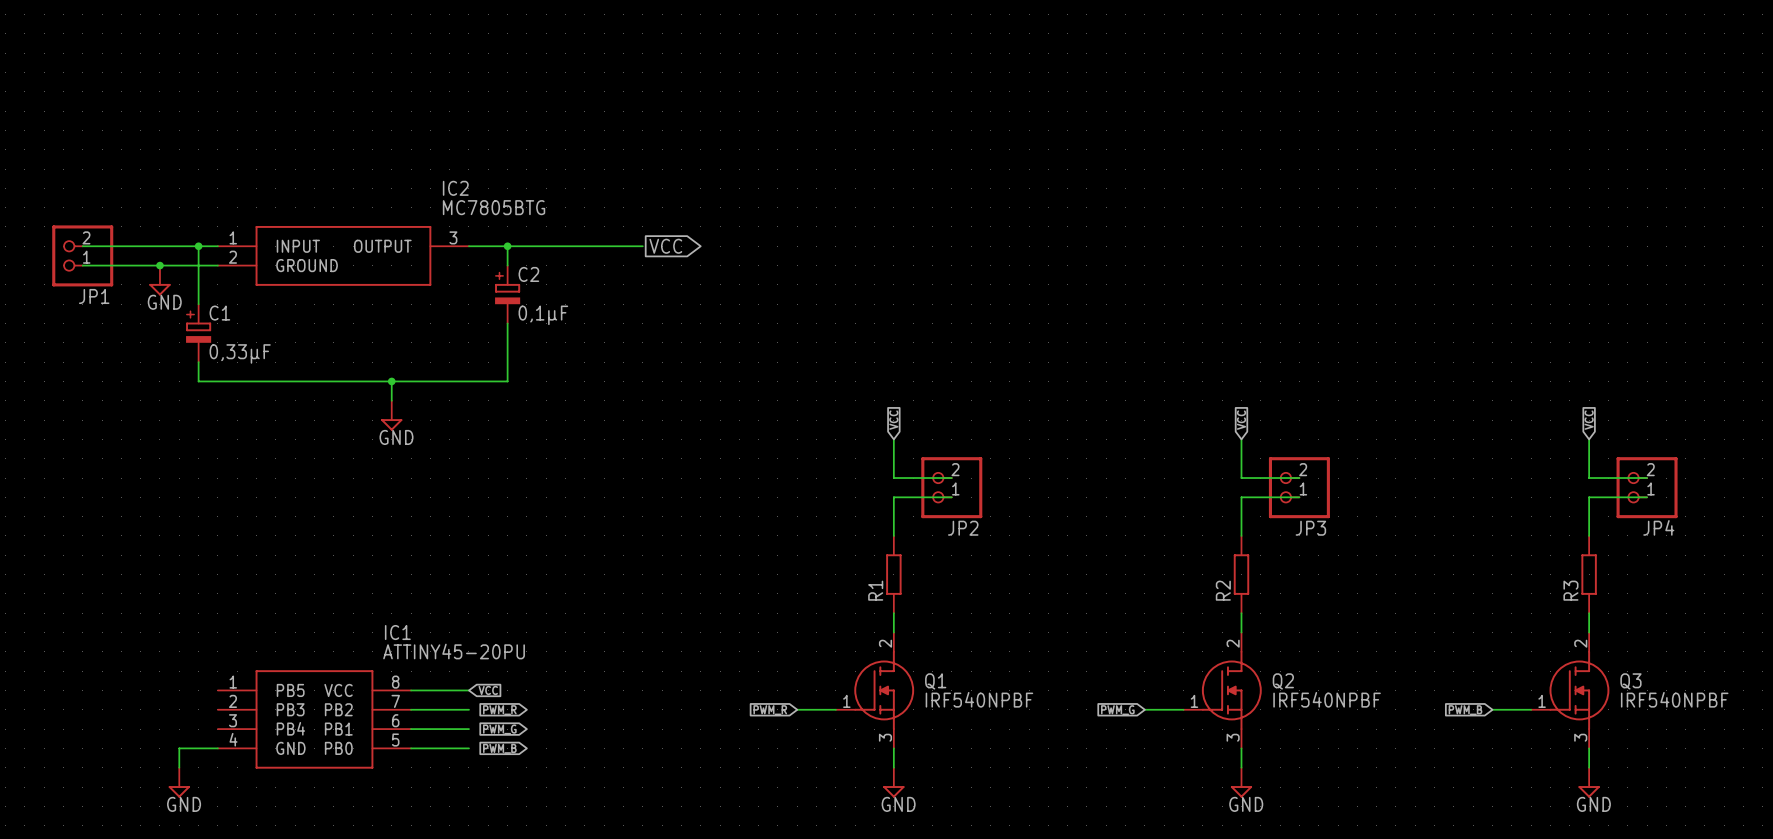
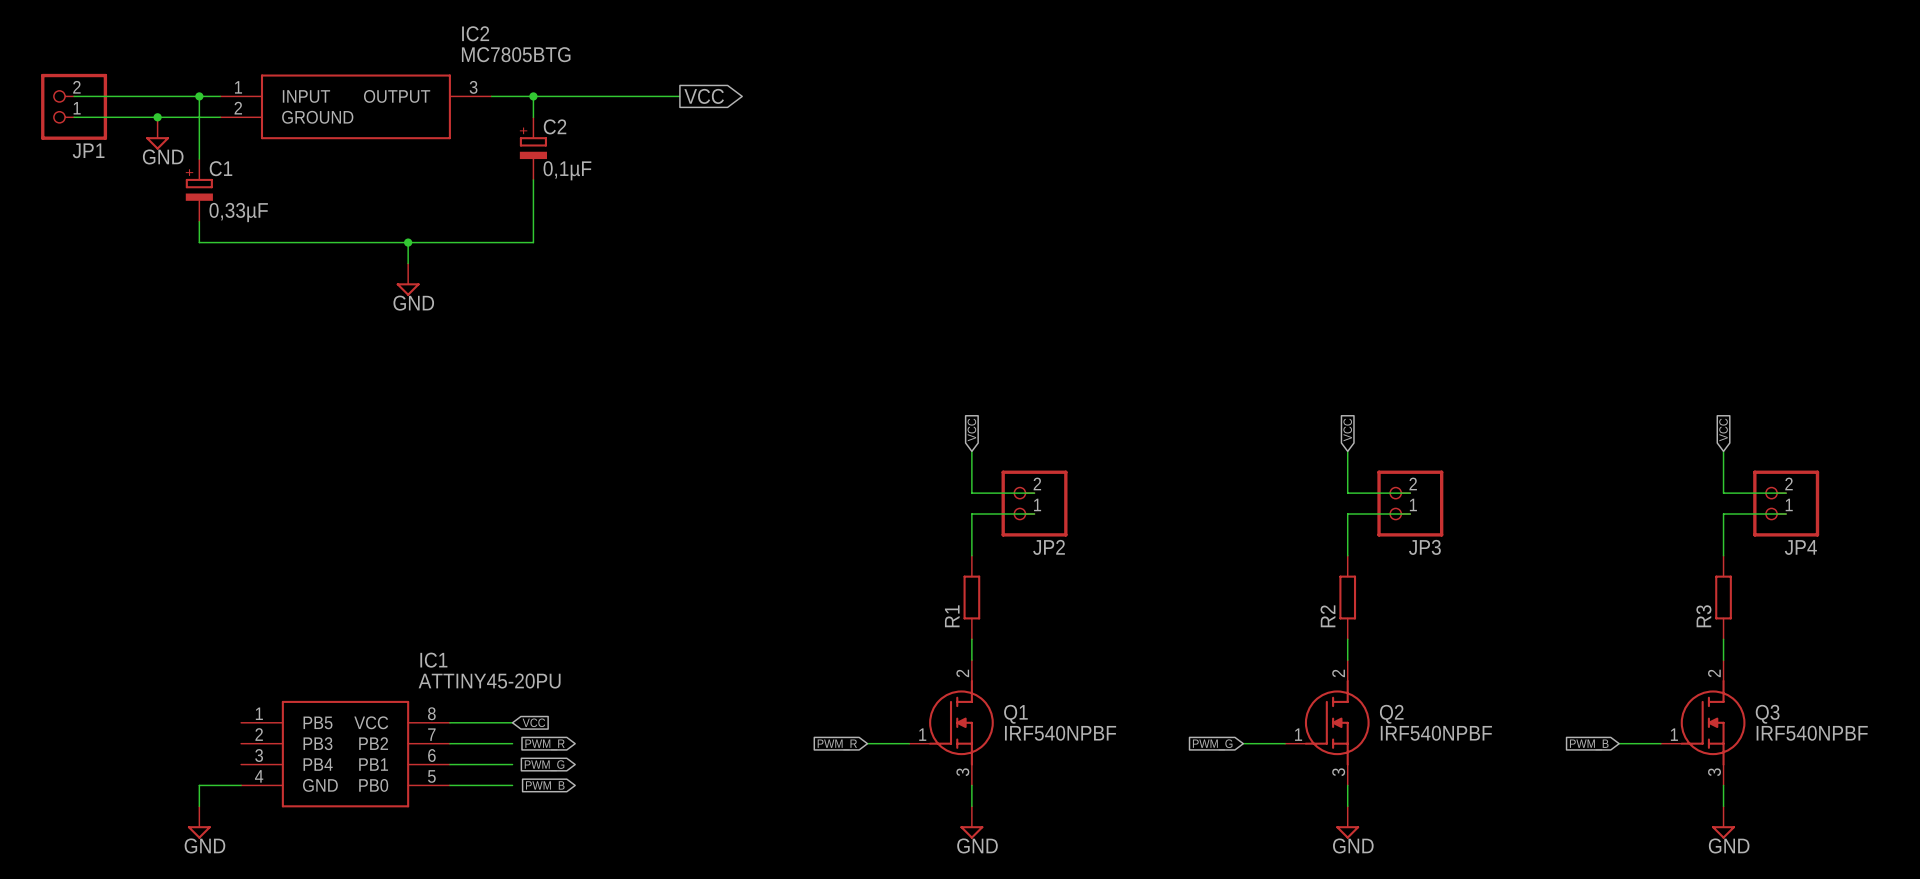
wire: none -> (74, 96) (220, 96)
junction: none -> (199, 96)
wire: none -> (491, 96) (679, 96)
junction: none -> (533, 96)
junction: none -> (157, 117)
power symbol: none -> GND (157, 133)
wire: (82, 246) (179, 246) -> (199, 221) (199, 242)
wire: (198, 246) (198, 304) -> (199, 96) (199, 159)
junction: (198, 246) -> none
wire: none -> (241, 242) (512, 242)
junction: none -> (408, 242)
wire: (488, 246) (642, 246) -> (533, 242) (533, 179)
wire: (507, 246) (507, 265) -> (533, 96) (533, 117)
junction: (507, 246) -> none
global label position: VCC (665, 246) -> VCC (704, 96)
JP1 position: (82, 255) -> (74, 106)
IC2 position: (343, 255) -> (355, 106)
wire: (82, 265) (217, 265) -> (74, 117) (220, 117)
junction: (159, 265) -> none
power symbol: GND (159, 280) -> none
power symbol: none -> GND (408, 279)
C2 position: (507, 294) -> (533, 148)
wire: (507, 323) (507, 381) (198, 381) (198, 362) -> none
C1 position: (198, 333) -> (199, 190)
wire: (391, 381) (391, 400) -> (408, 242) (408, 263)
junction: (391, 381) -> none
power symbol: GND (391, 415) -> none

